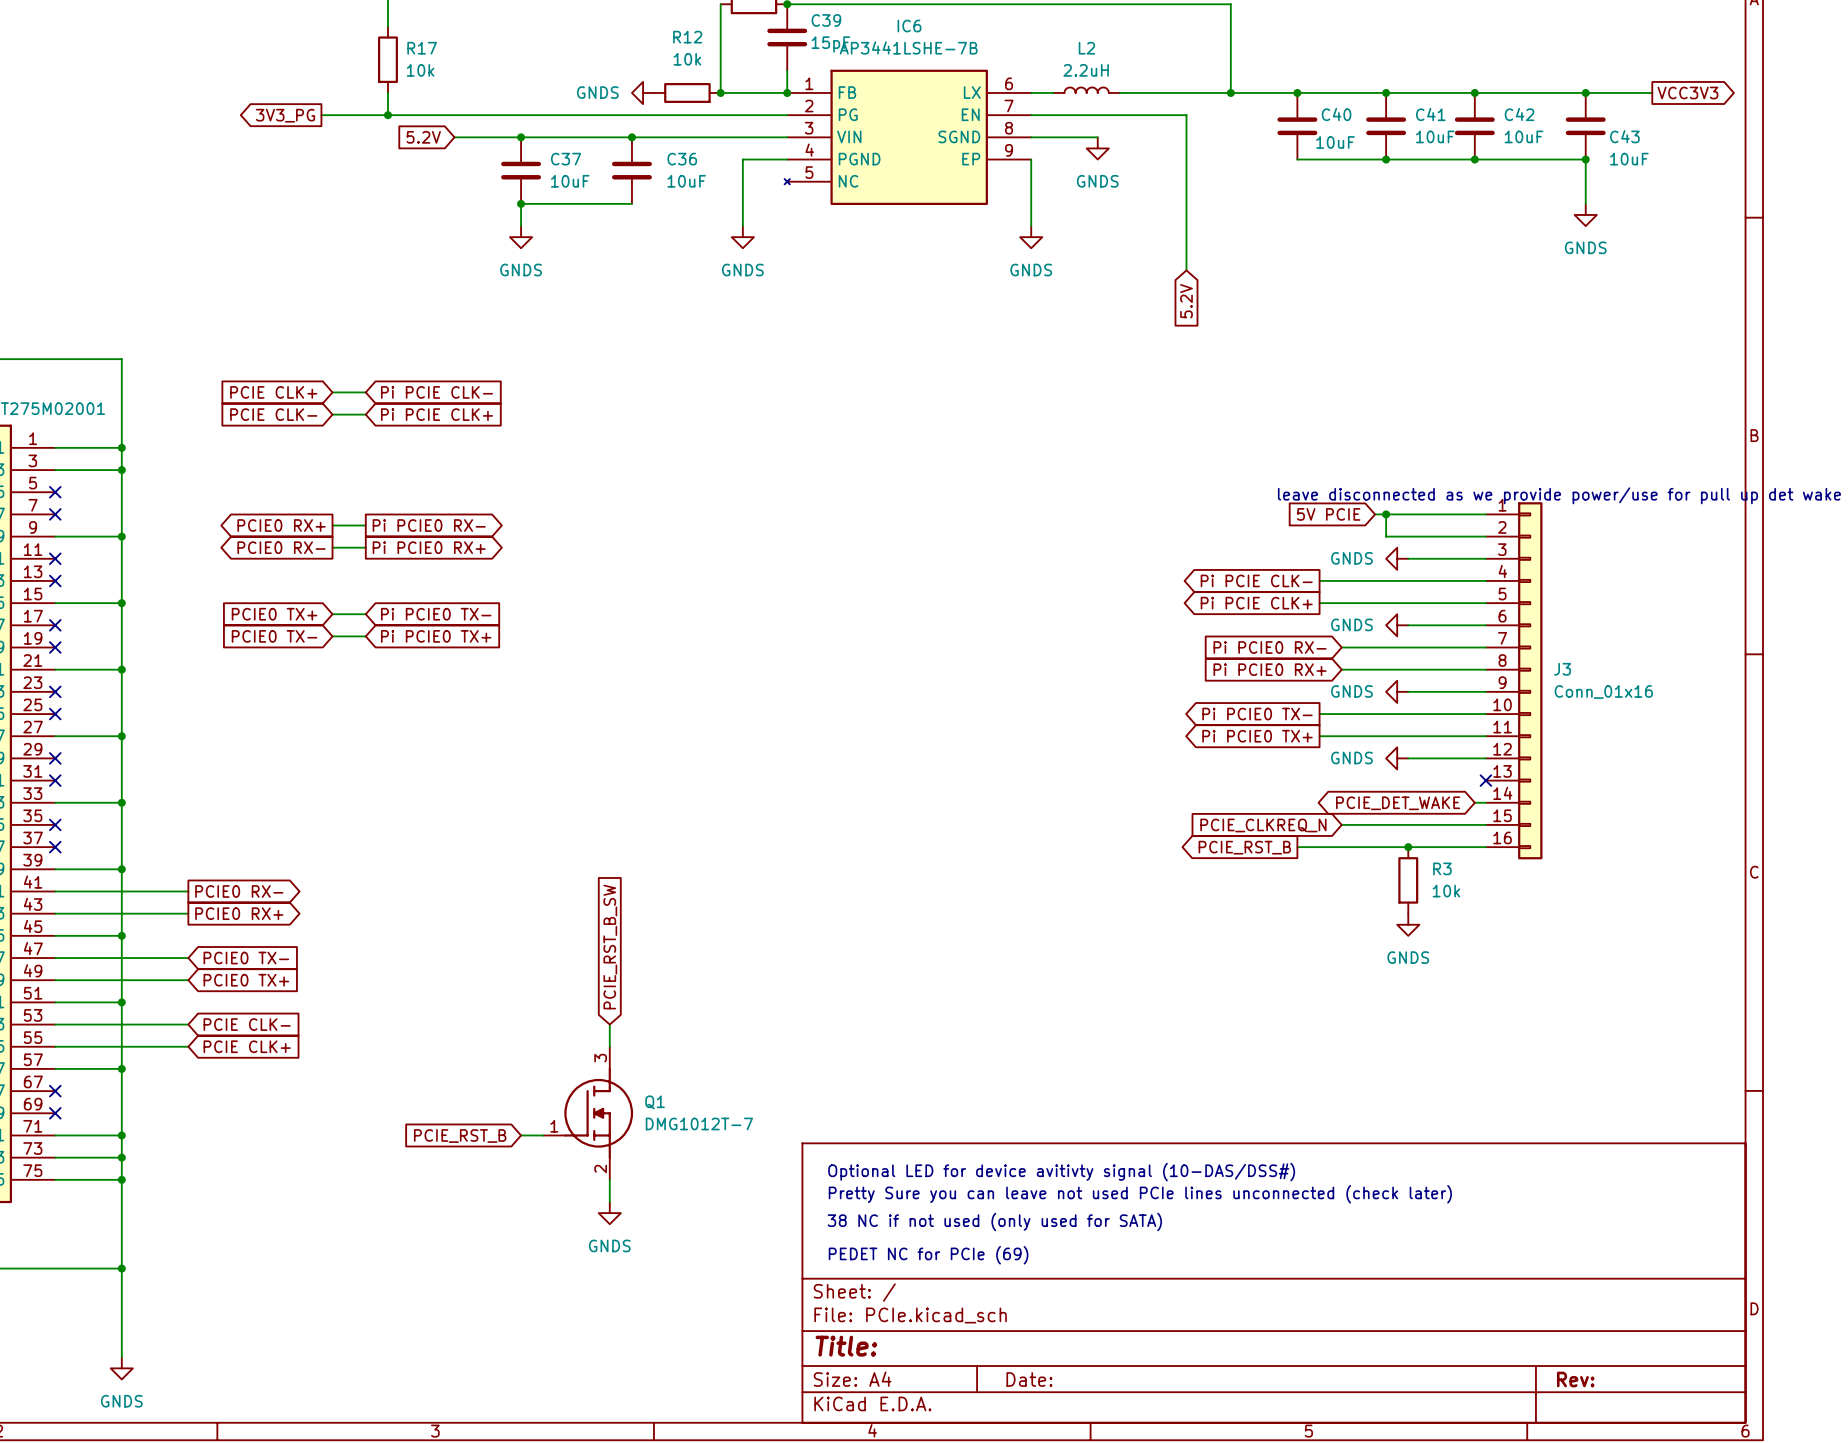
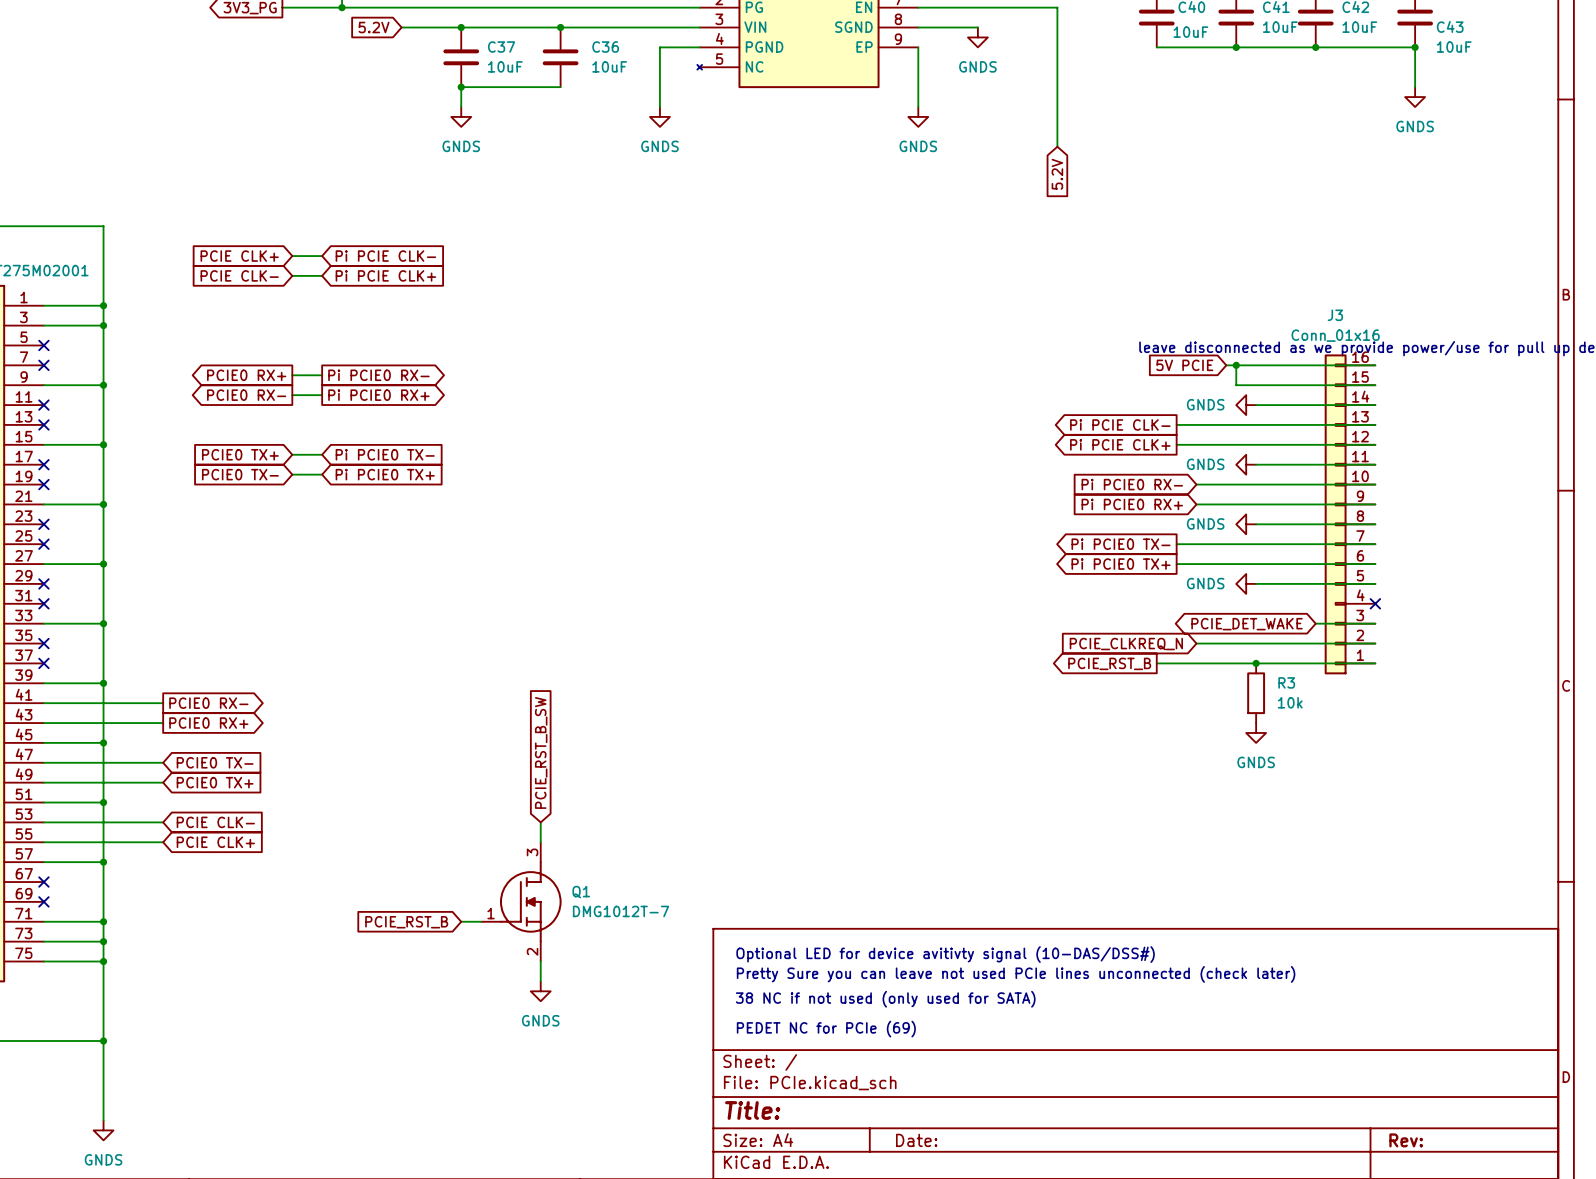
J3 name position: J3 (1562, 669) -> J3 (1335, 315)
J3 rotation: 0° (1530, 680) -> 180° (1335, 514)
J3 value position: Conn_01x16 (1603, 691) -> Conn_01x16 (1335, 335)
no-connect mark: (1485, 780) -> none
no-connect mark: none -> (1375, 603)

